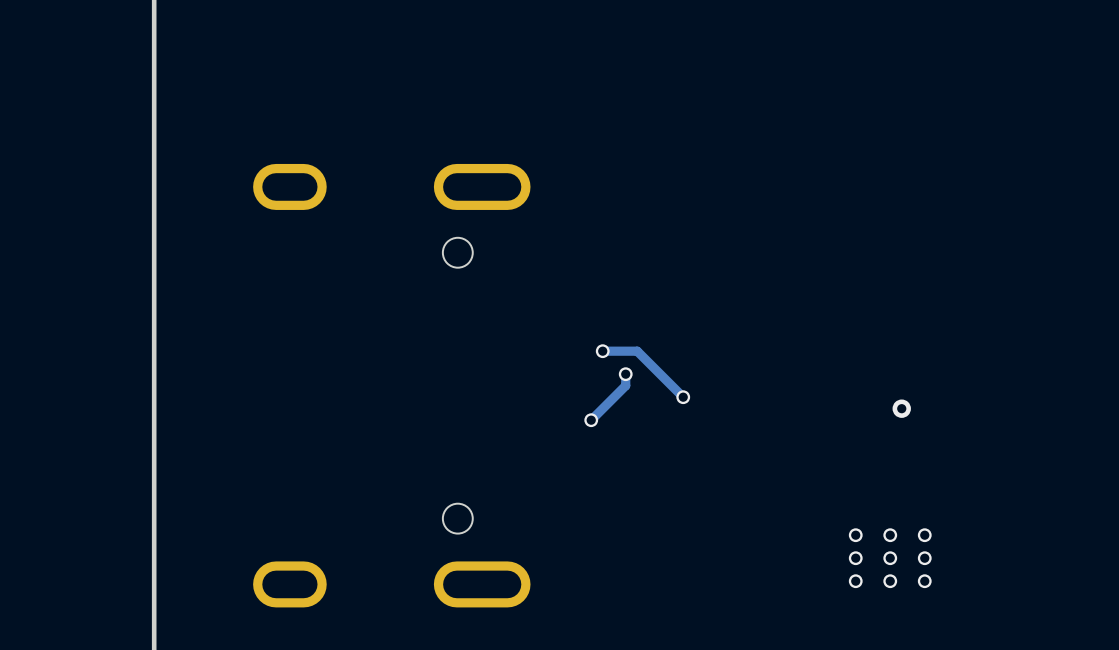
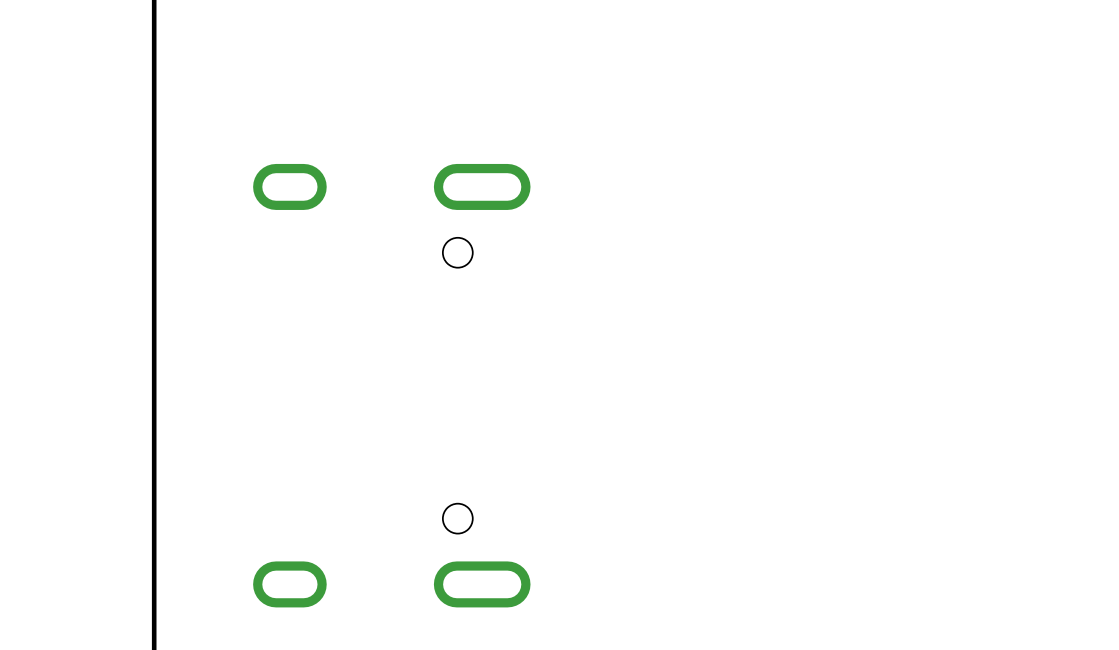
track: (602, 351) (637, 351) (683, 397) -> none
via: (602, 351) -> none
track: (625, 374) (625, 385) (591, 420) -> none
via: (625, 374) -> none
via: (683, 397) -> none
via: (901, 408) -> none
via: (591, 420) -> none
via: (855, 535) -> none
via: (890, 535) -> none
via: (924, 535) -> none
via: (855, 558) -> none
via: (890, 558) -> none
via: (924, 558) -> none
via: (855, 581) -> none
via: (890, 581) -> none
via: (924, 581) -> none

